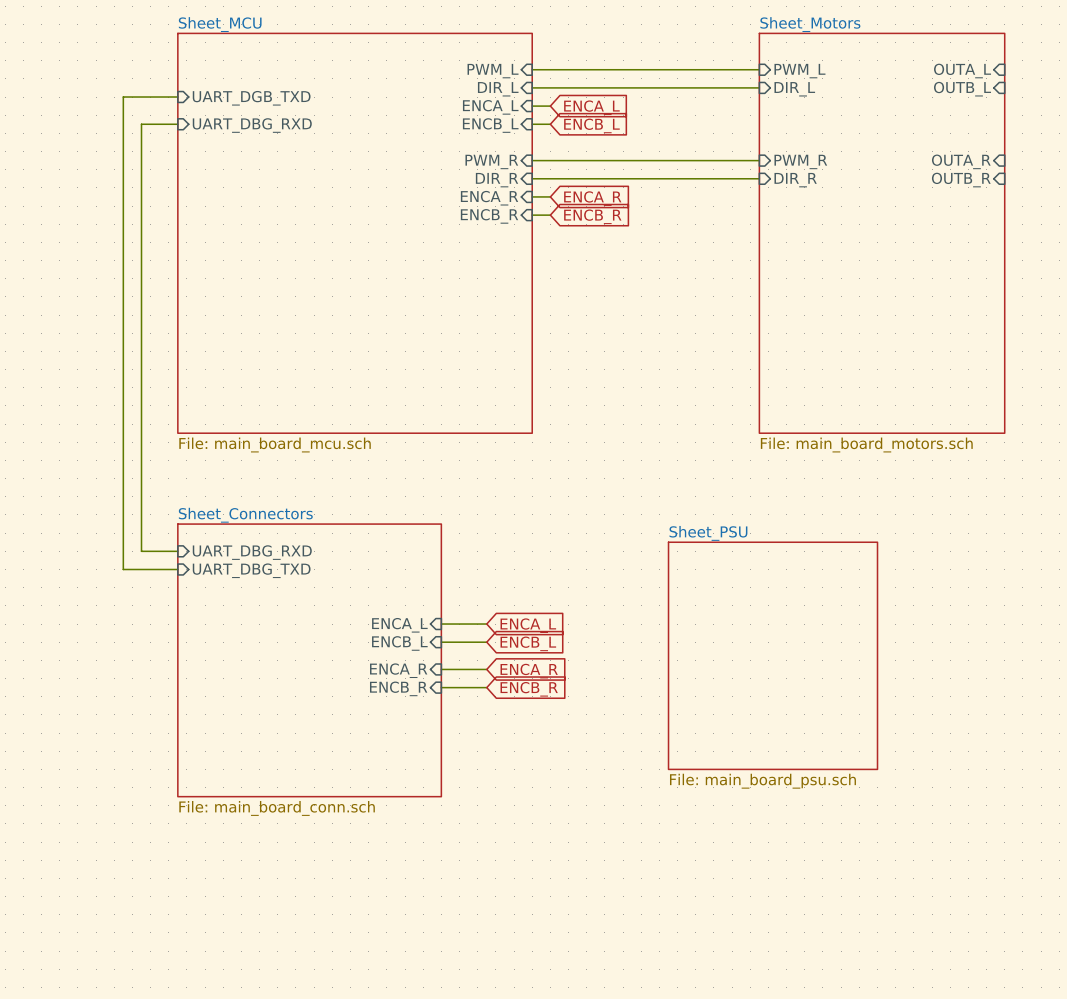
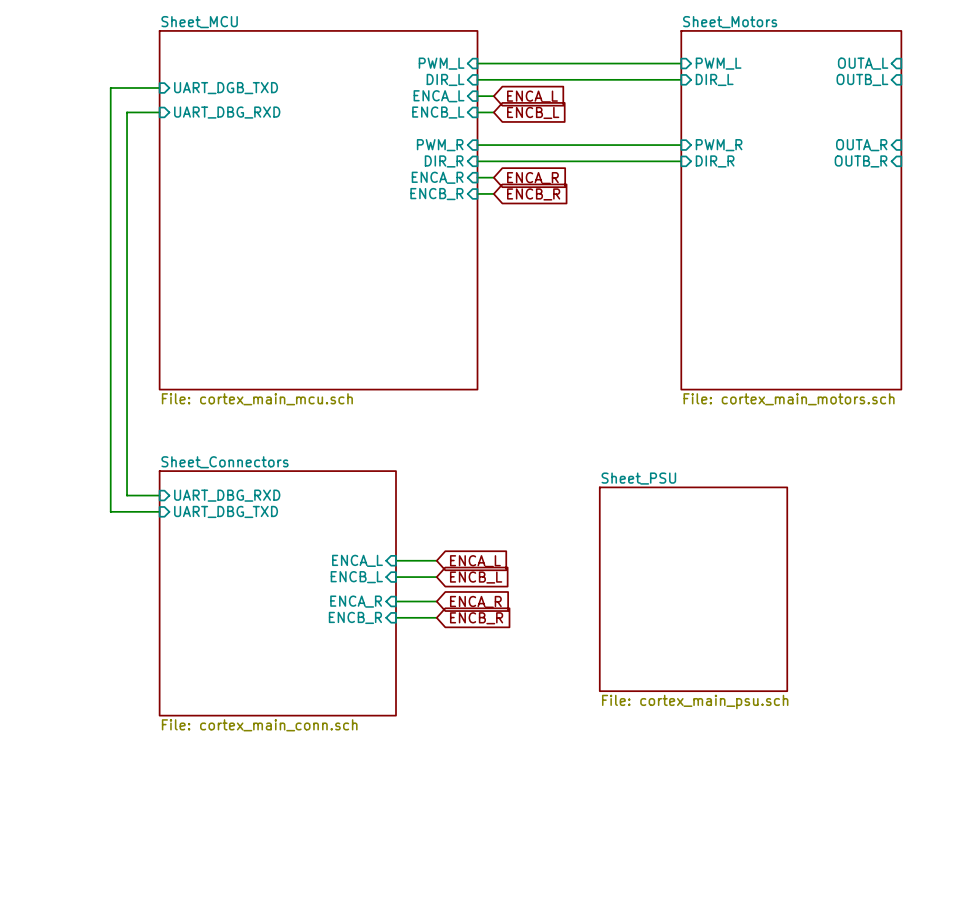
sheet Sheet_MCU value: File: main_board_mcu.sch (275, 445) -> File: cortex_main_mcu.sch (257, 399)
sheet Sheet_Motors value: File: main_board_motors.sch (866, 445) -> File: cortex_main_motors.sch (789, 399)
sheet Sheet_PSU value: File: main_board_psu.sch (762, 781) -> File: cortex_main_psu.sch (695, 702)
sheet Sheet_Connectors value: File: main_board_conn.sch (277, 808) -> File: cortex_main_conn.sch (259, 725)

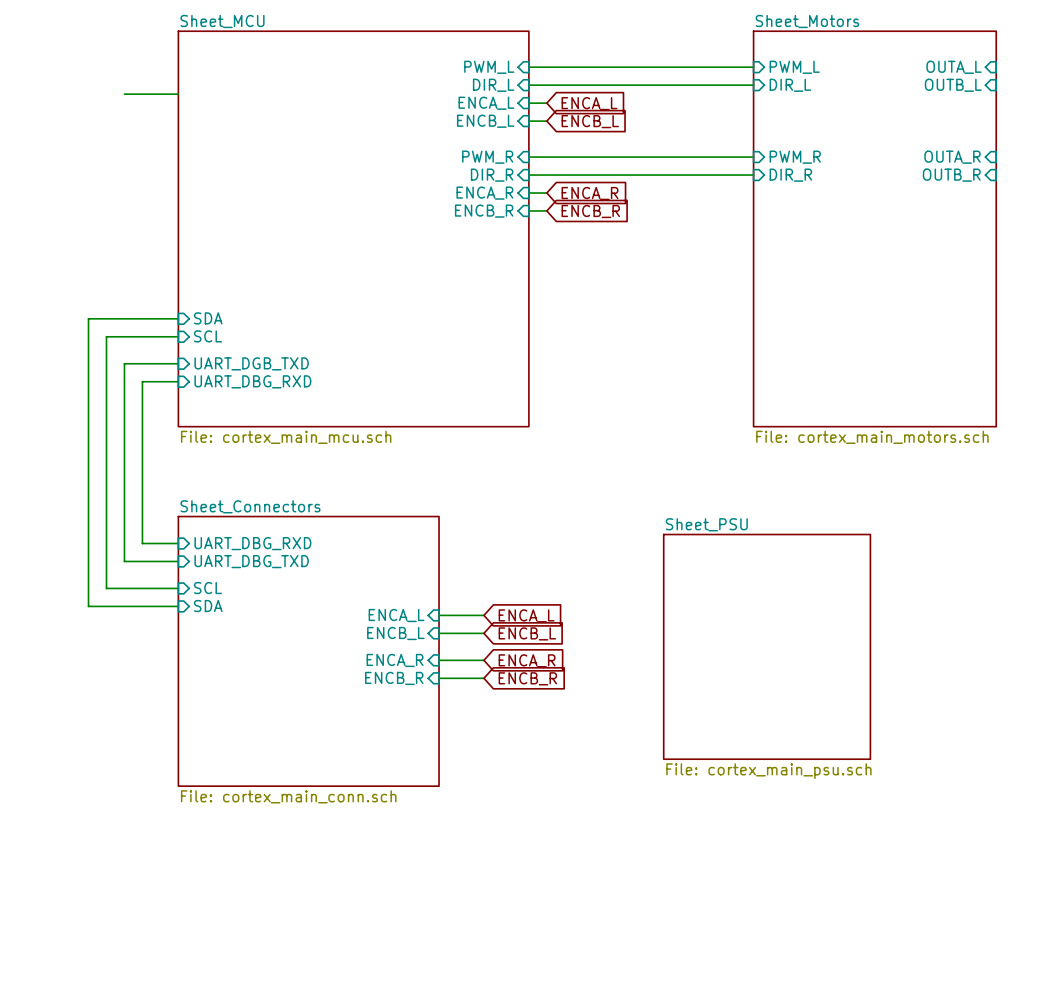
wire: (110, 87) (110, 332) -> (178, 363) (124, 363)
sheet pin: UART_DGB_TXD (226, 88) -> none
wire: (159, 112) (127, 112) (127, 348) -> (178, 381) (142, 381)
sheet pin: UART_DBG_RXD (227, 112) -> none
wire: none -> (178, 318) (88, 318) (88, 606) (178, 606)
sheet pin: none -> SDA (208, 318)
sheet pin: none -> SCL (207, 336)
wire: none -> (178, 336) (106, 336) (106, 588) (178, 588)
sheet pin: none -> UART_DGB_TXD (251, 363)
sheet pin: none -> UART_DBG_RXD (252, 381)
sheet pin: none -> SCL (207, 588)
sheet pin: none -> SDA (208, 606)

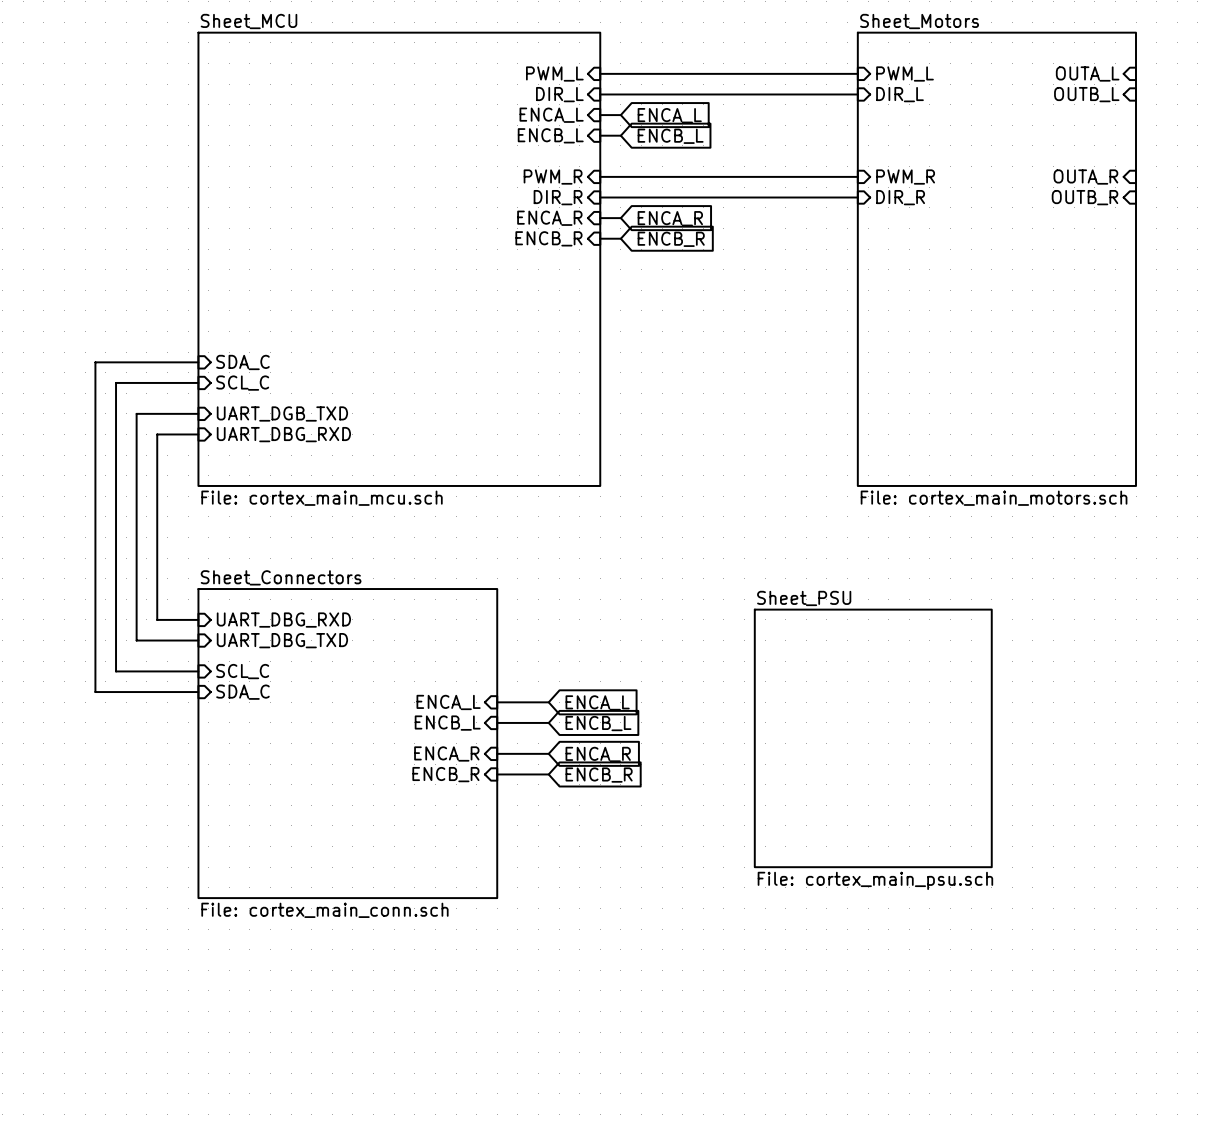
wire: (124, 94) (178, 94) -> none
sheet pin: SDA (208, 318) -> SDA_C (242, 362)
sheet pin: SCL (207, 336) -> SCL_C (242, 383)
sheet pin: SCL (207, 588) -> SCL_C (242, 671)
sheet pin: SDA (208, 606) -> SDA_C (242, 692)

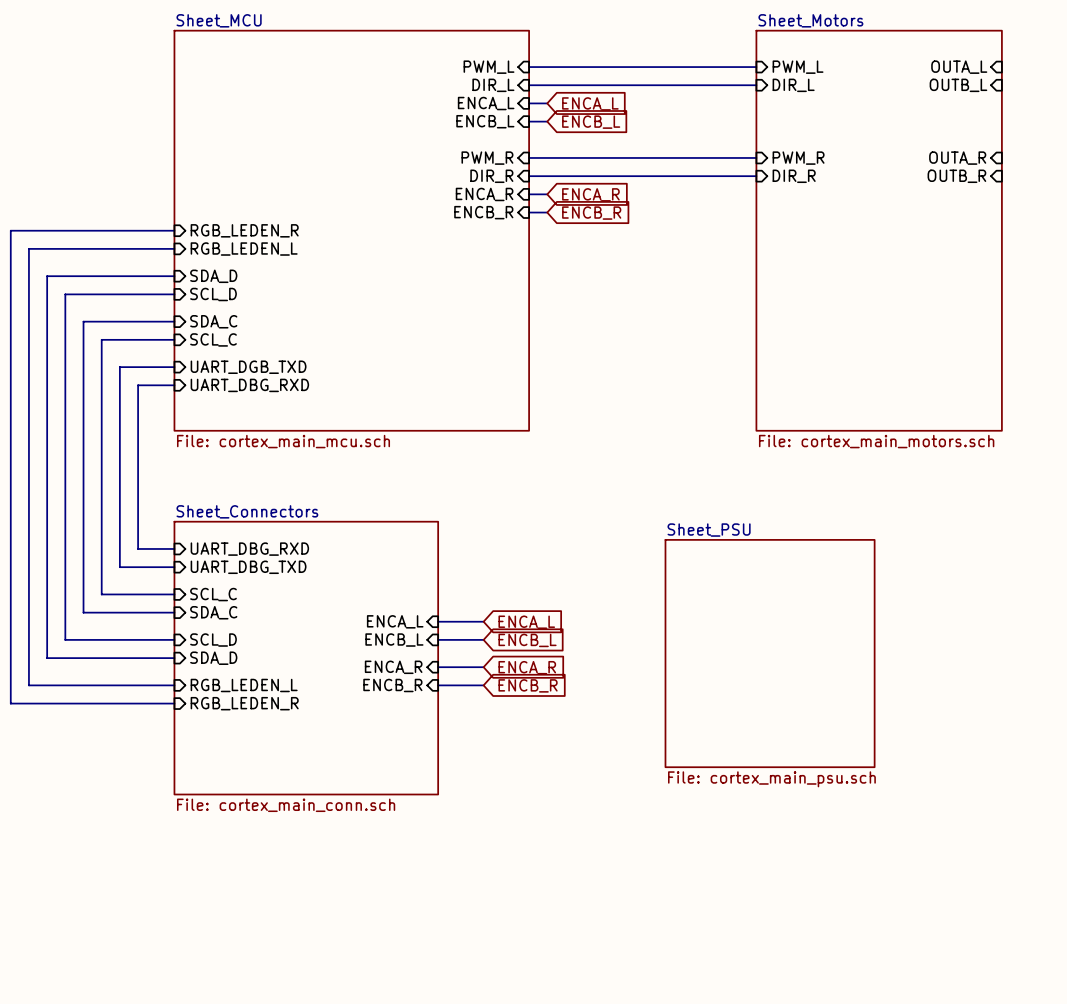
wire: none -> (174, 230) (10, 230) (10, 703) (174, 703)
sheet pin: none -> RGB_LEDEN_R (244, 230)
wire: none -> (174, 248) (28, 248) (28, 685) (174, 685)
sheet pin: none -> RGB_LEDEN_L (244, 249)
wire: none -> (174, 276) (47, 276) (47, 658) (174, 658)
sheet pin: none -> SDA_D (213, 276)
wire: none -> (174, 294) (65, 294) (65, 639) (174, 639)
sheet pin: none -> SCL_D (213, 294)
sheet pin: none -> SCL_D (213, 640)
sheet pin: none -> SDA_D (213, 658)
sheet pin: none -> RGB_LEDEN_L (244, 685)
sheet pin: none -> RGB_LEDEN_R (244, 703)

